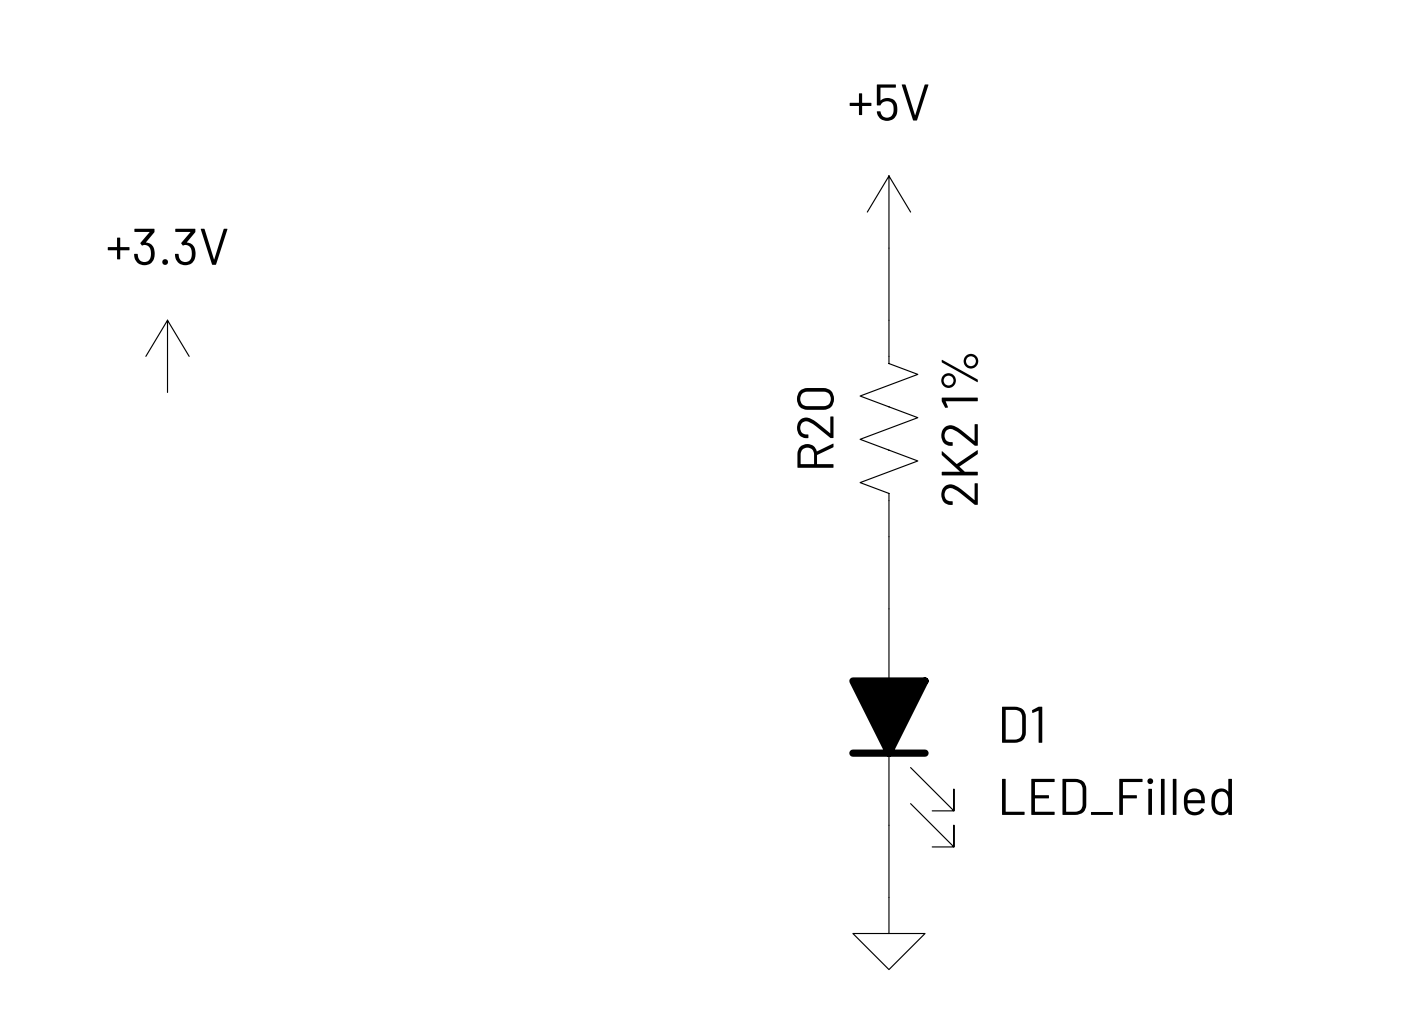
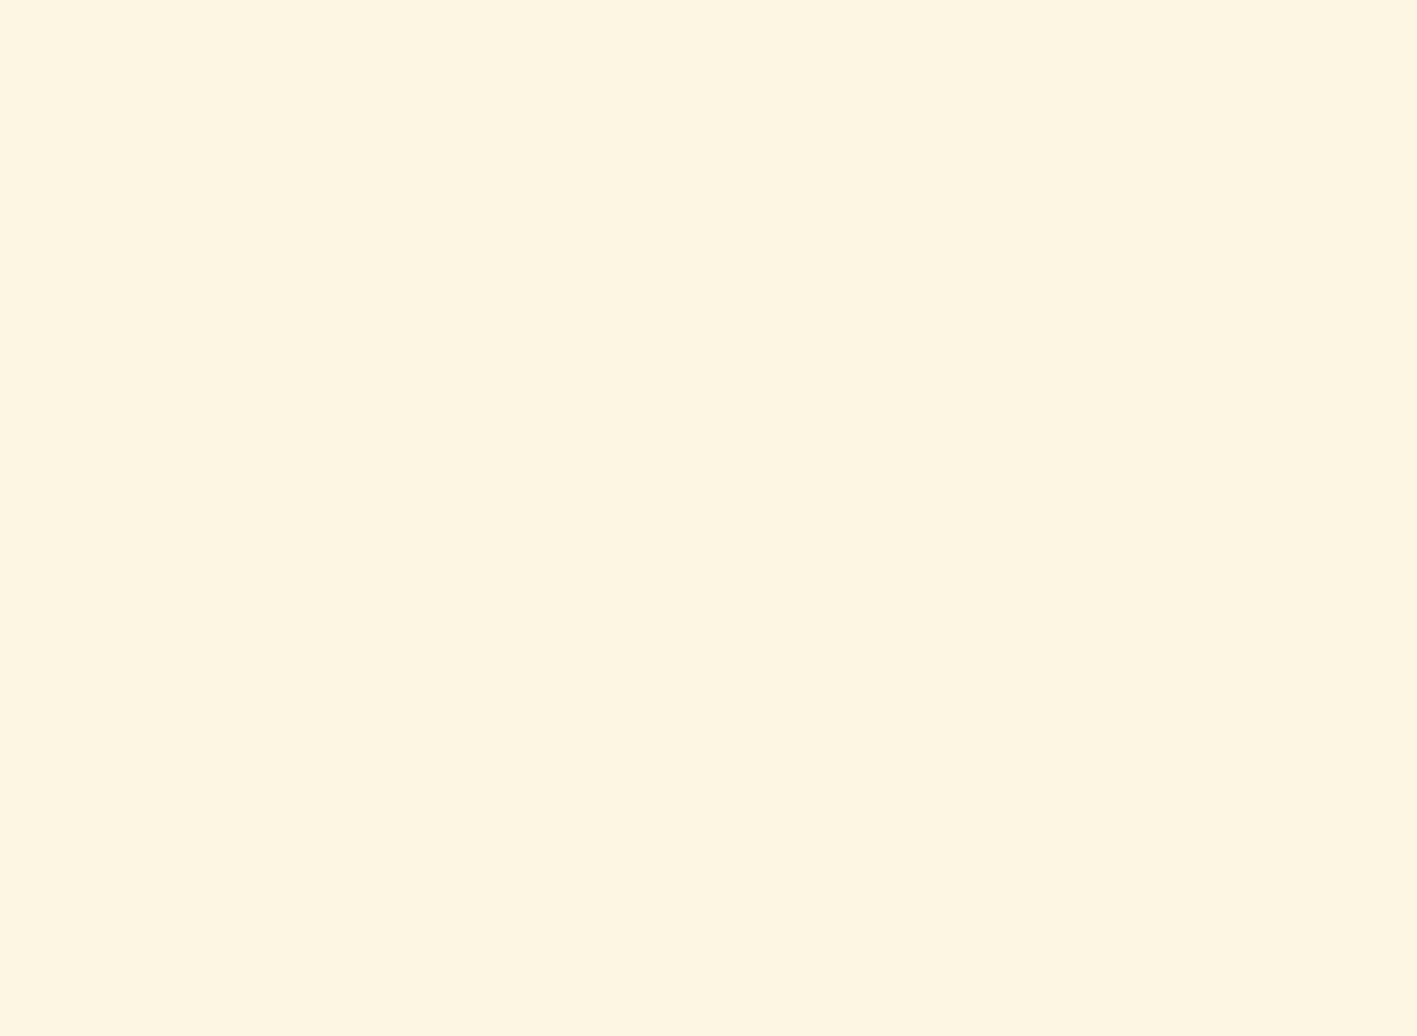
power symbol: +5V (888, 212) -> none
wire: (888, 248) (888, 320) -> none
power symbol: +3.3V (167, 356) -> none
R20: 2K2 1% (888, 428) -> none
wire: (888, 536) (888, 608) -> none
D1: LED_Filled (901, 727) -> none
wire: (888, 825) (888, 897) -> none
power symbol: (888, 933) -> none

